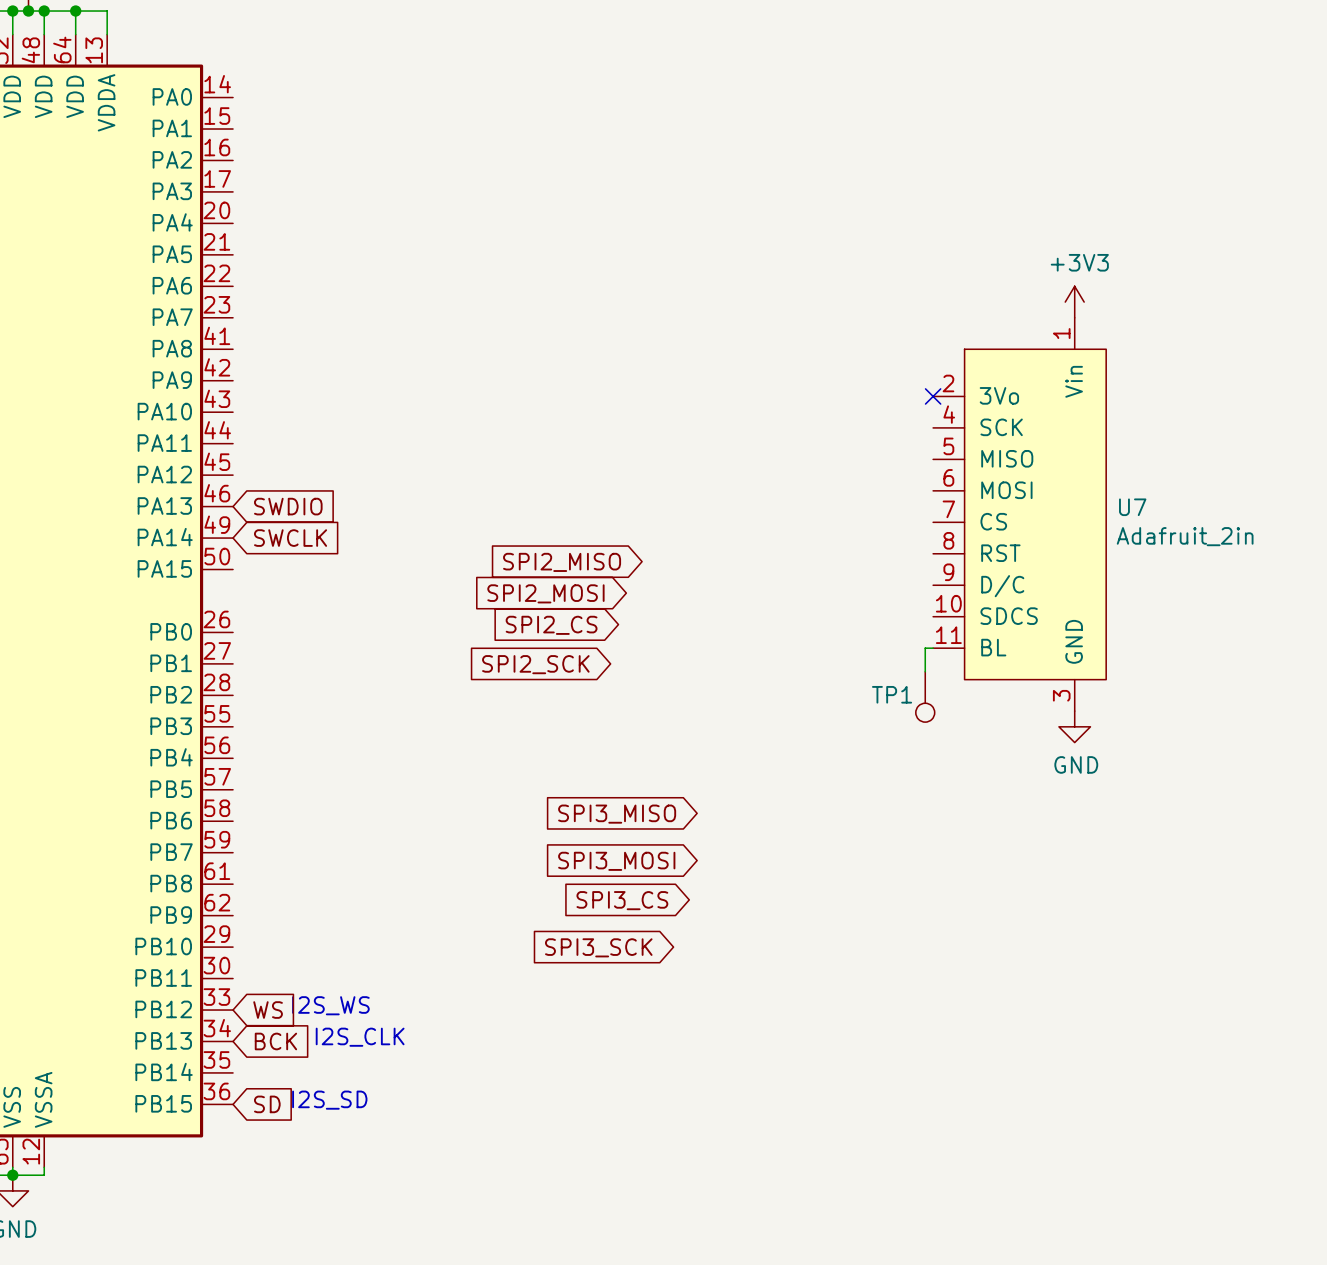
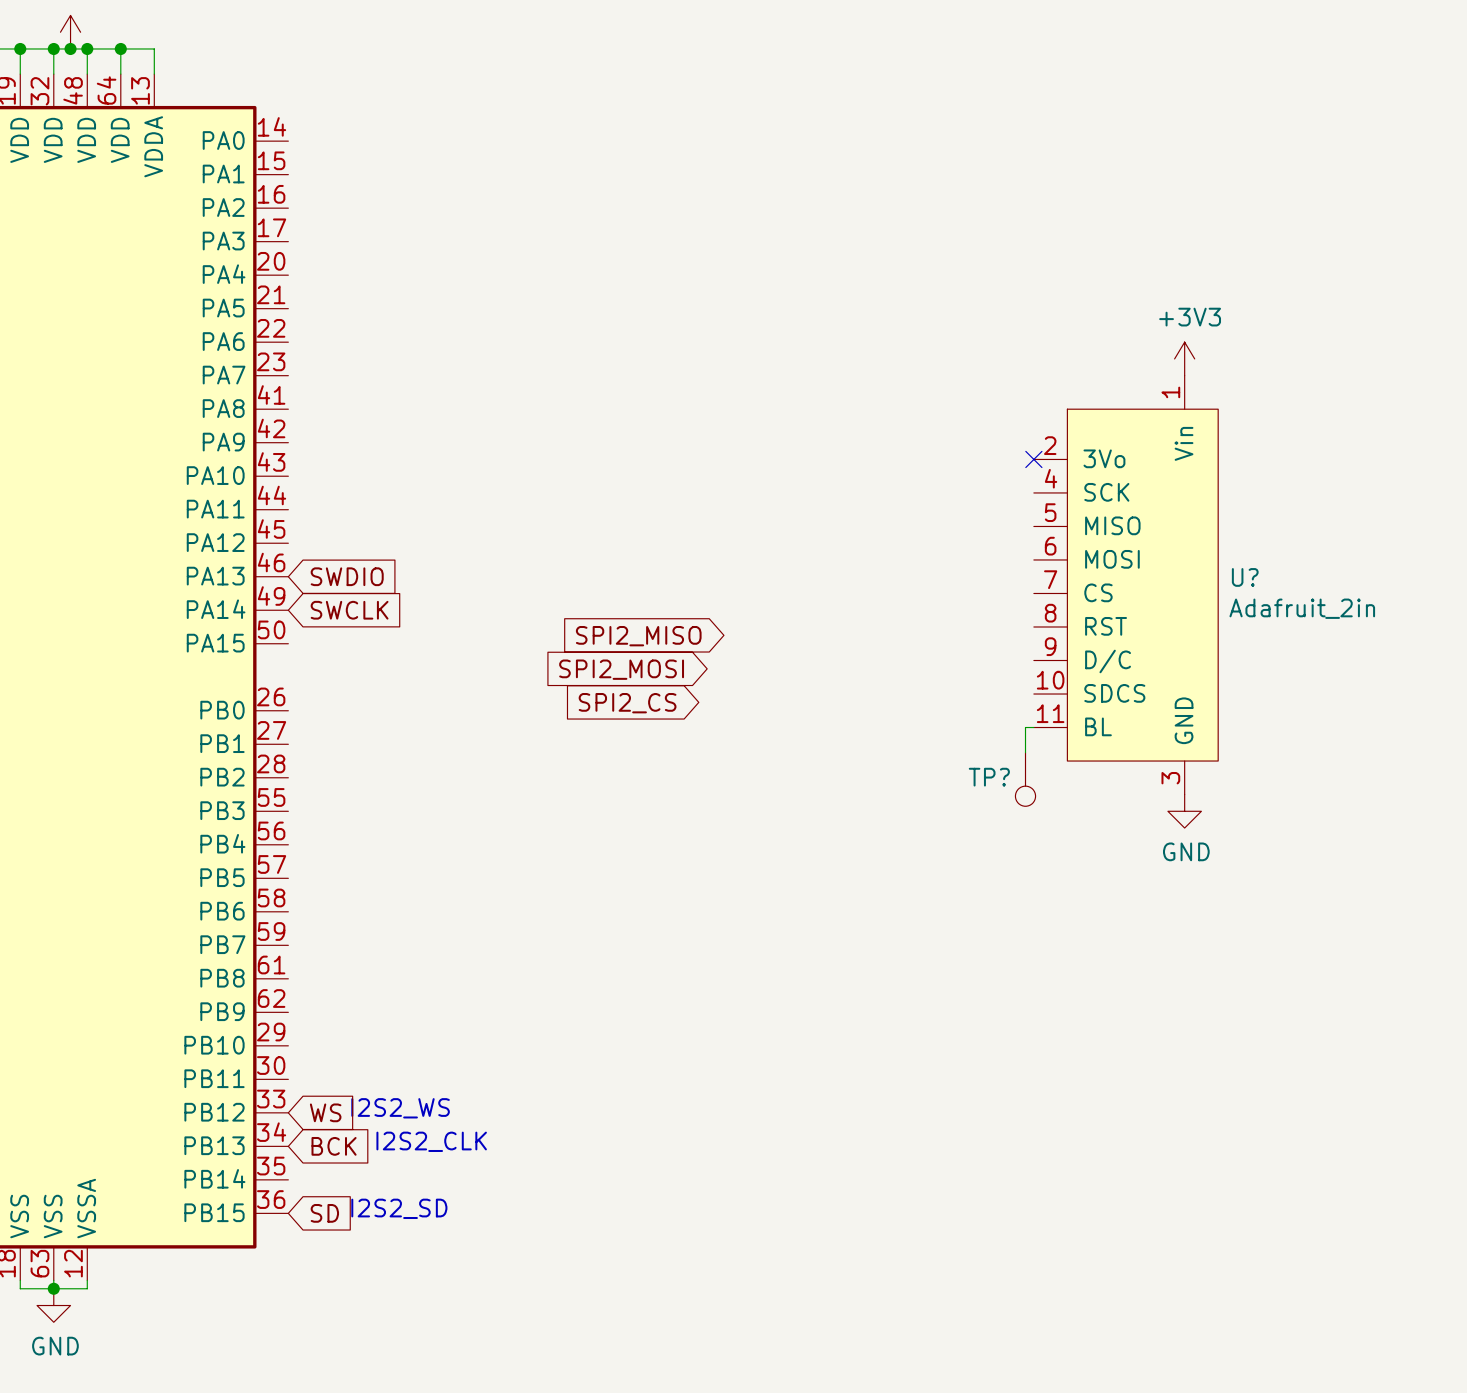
U7 name: U7 (1132, 507) -> U? (1245, 577)
global label: SPI2_SCK (535, 664) -> none
TP1 name: TP1 (892, 694) -> TP? (989, 777)
global label: SPI3_MISO (617, 814) -> none
global label: SPI3_MOSI (616, 861) -> none
global label: SPI3_CS (622, 900) -> none
global label: SPI3_SCK (598, 947) -> none
text: I2S_WS (330, 1005) -> I2S2_WS (400, 1108)
text: I2S_CLK (360, 1037) -> I2S2_CLK (431, 1141)
text: I2S_SD (329, 1100) -> I2S2_SD (399, 1208)

